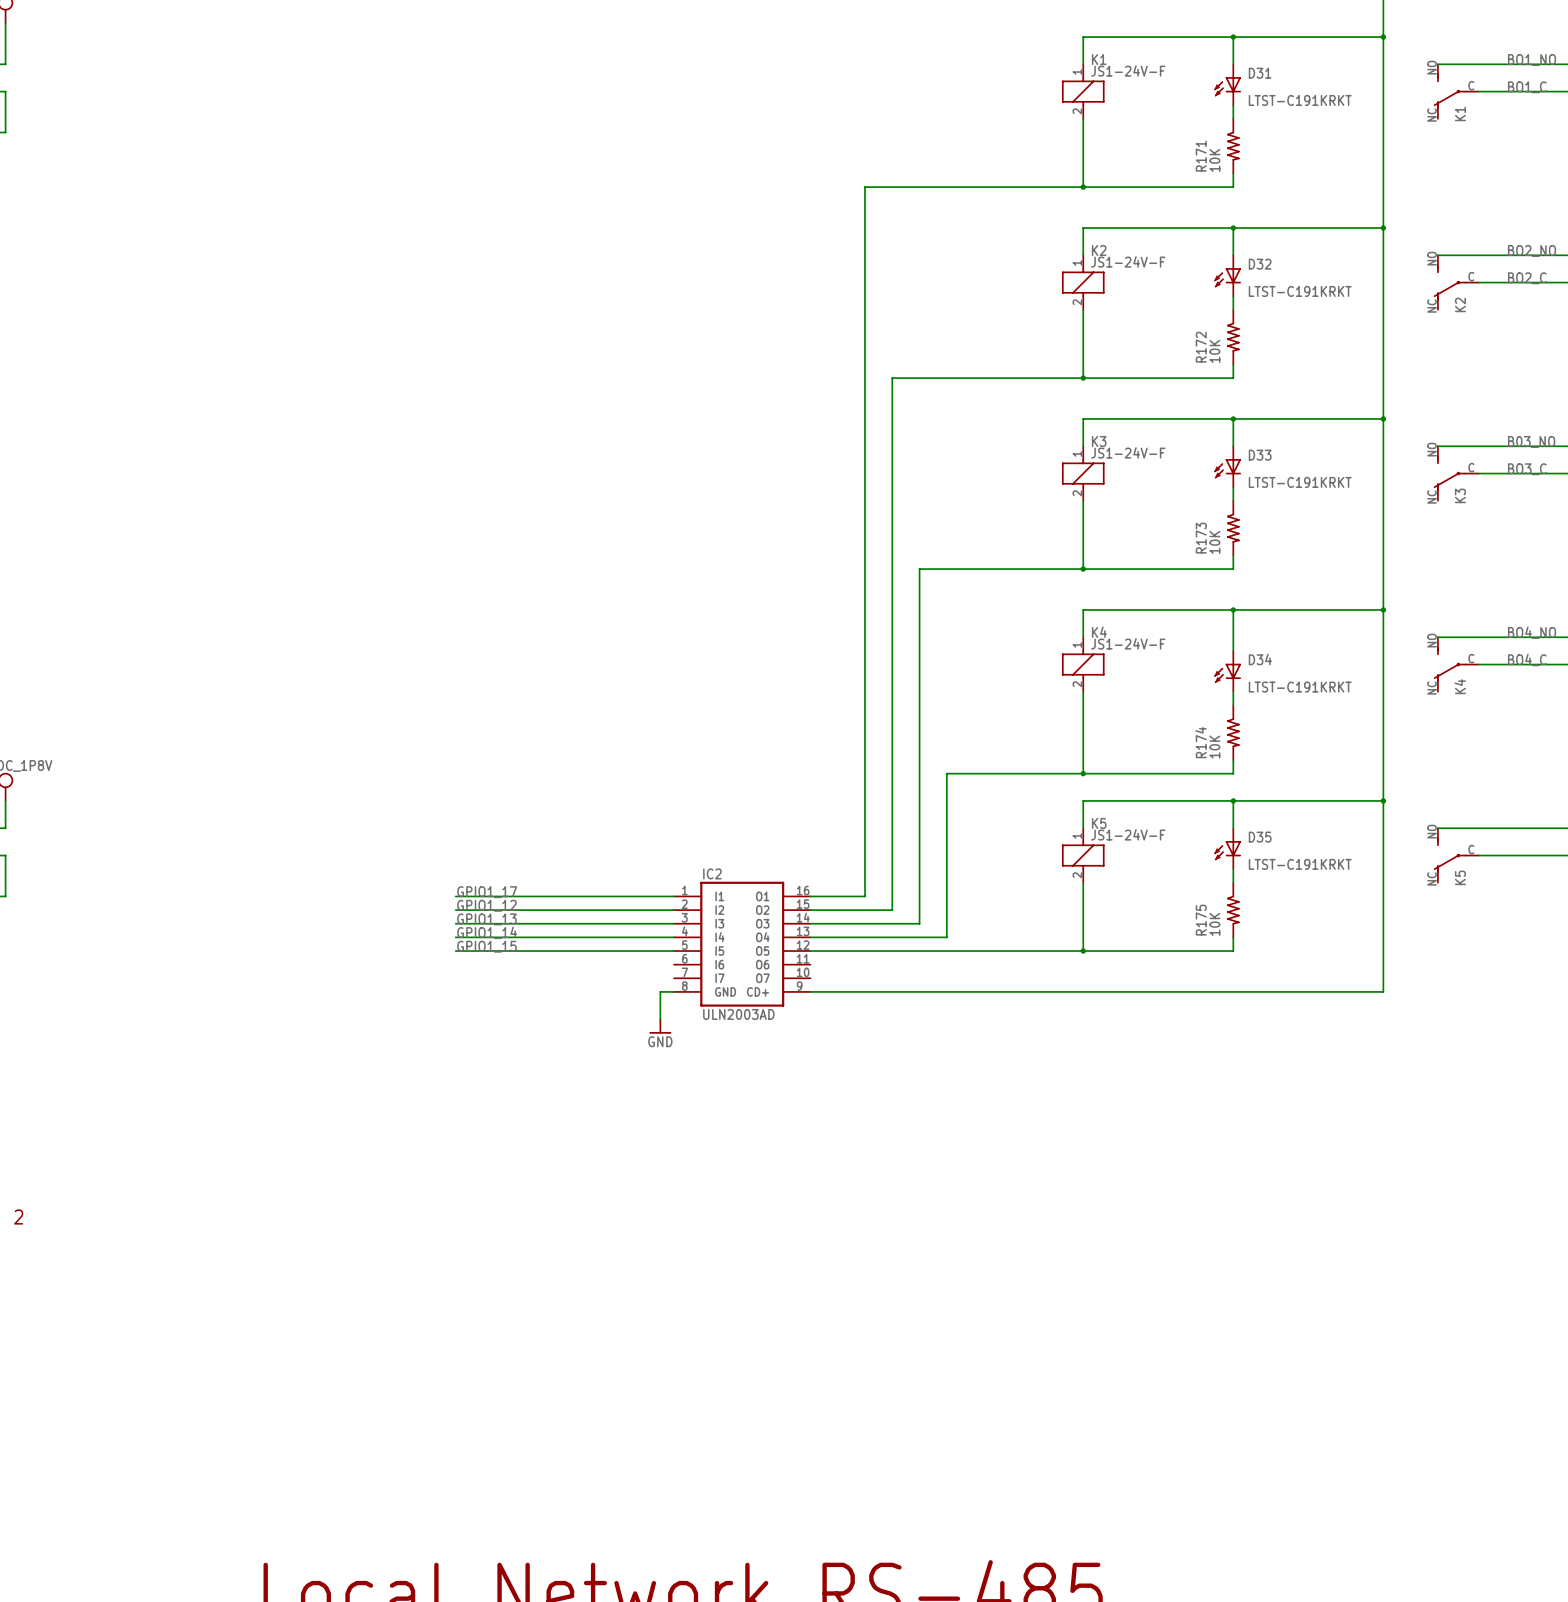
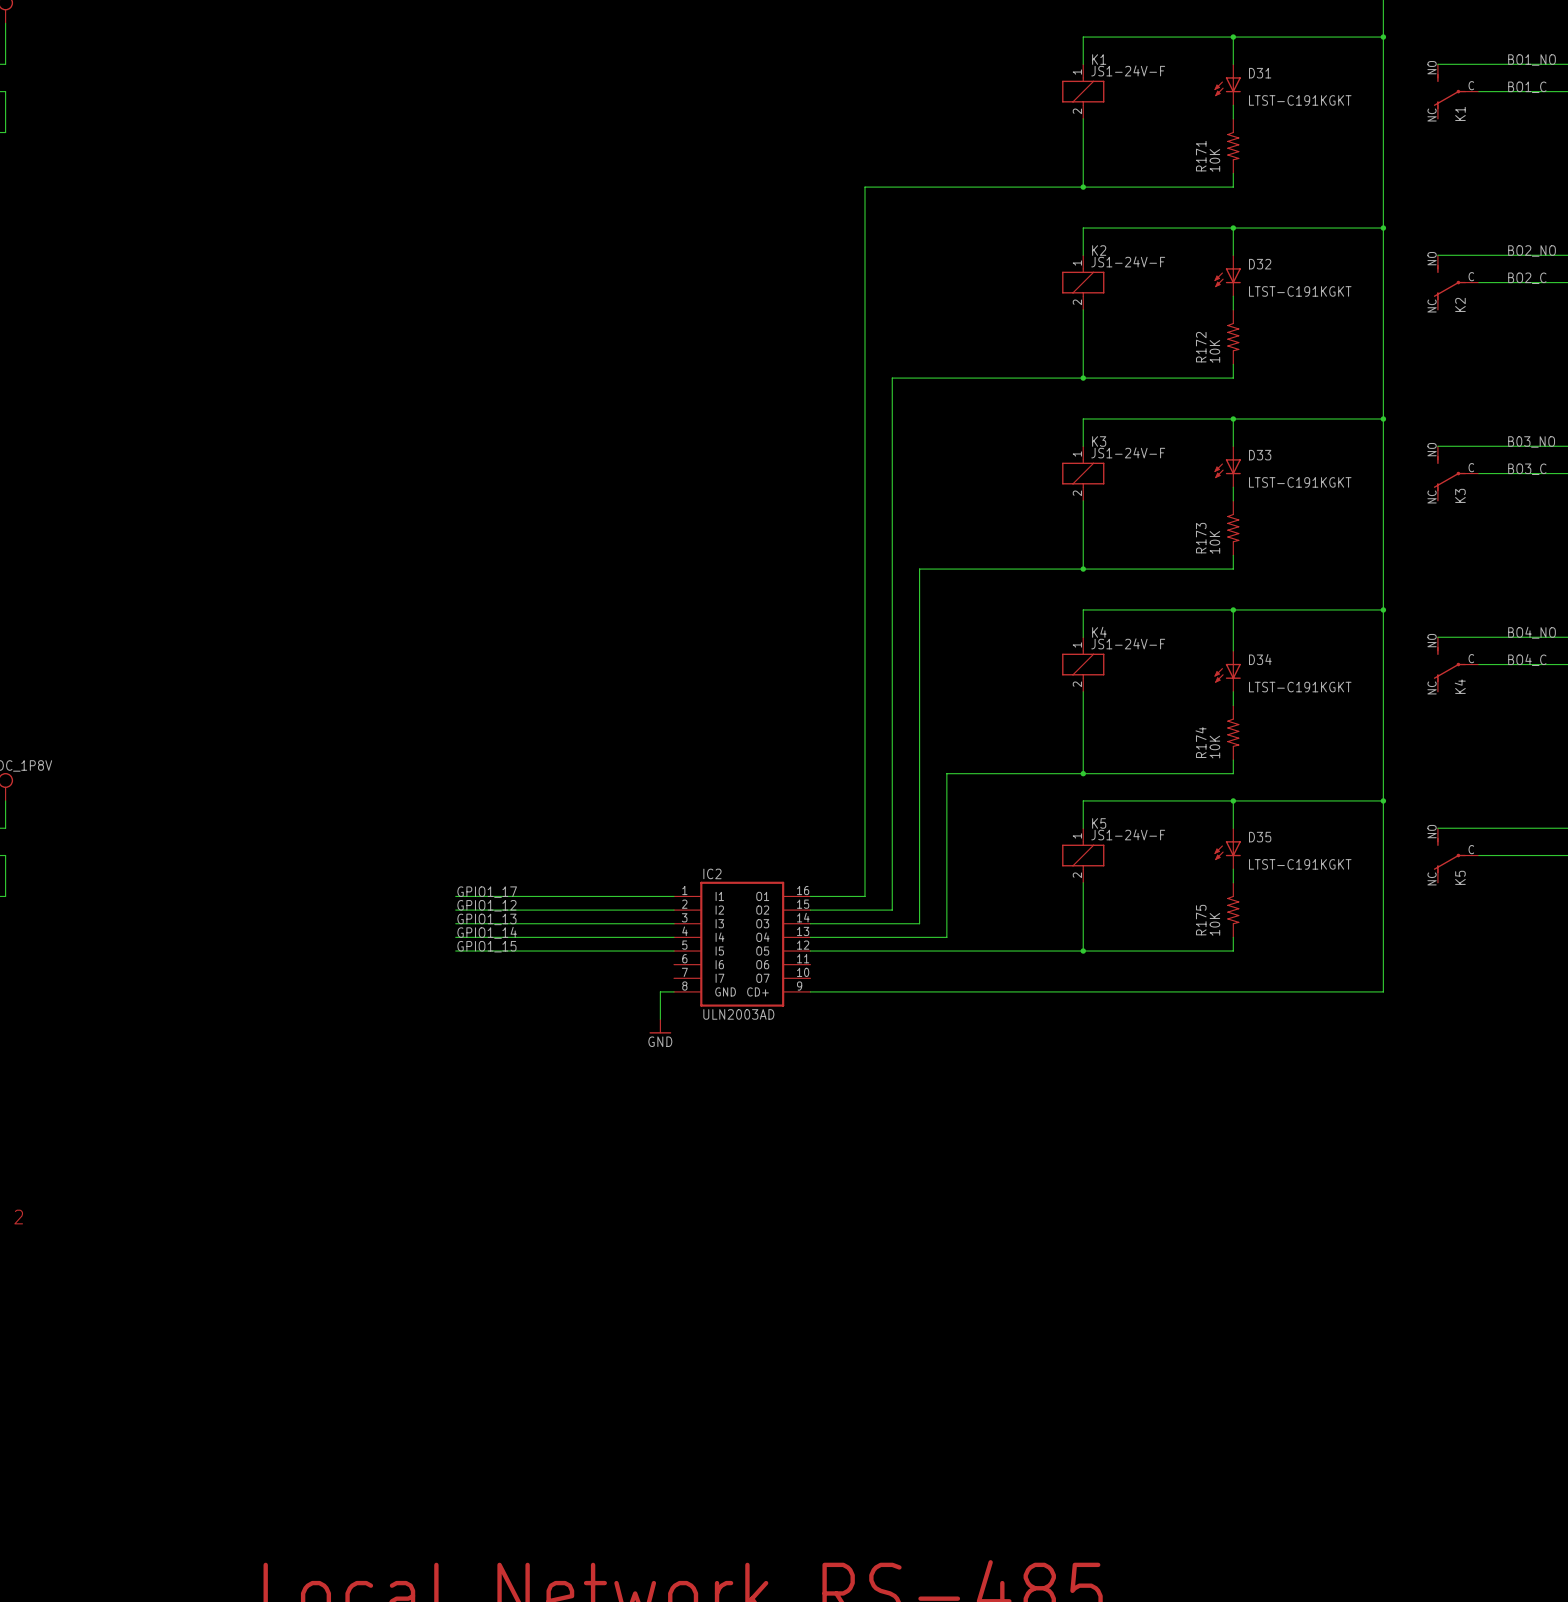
D31 value: LTST-C191KRKT (1300, 100) -> LTST-C191KGKT (1300, 100)
D32 value: LTST-C191KRKT (1300, 291) -> LTST-C191KGKT (1300, 291)
D33 value: LTST-C191KRKT (1300, 482) -> LTST-C191KGKT (1300, 482)
D34 value: LTST-C191KRKT (1300, 687) -> LTST-C191KGKT (1300, 687)
D35 value: LTST-C191KRKT (1300, 864) -> LTST-C191KGKT (1300, 864)

